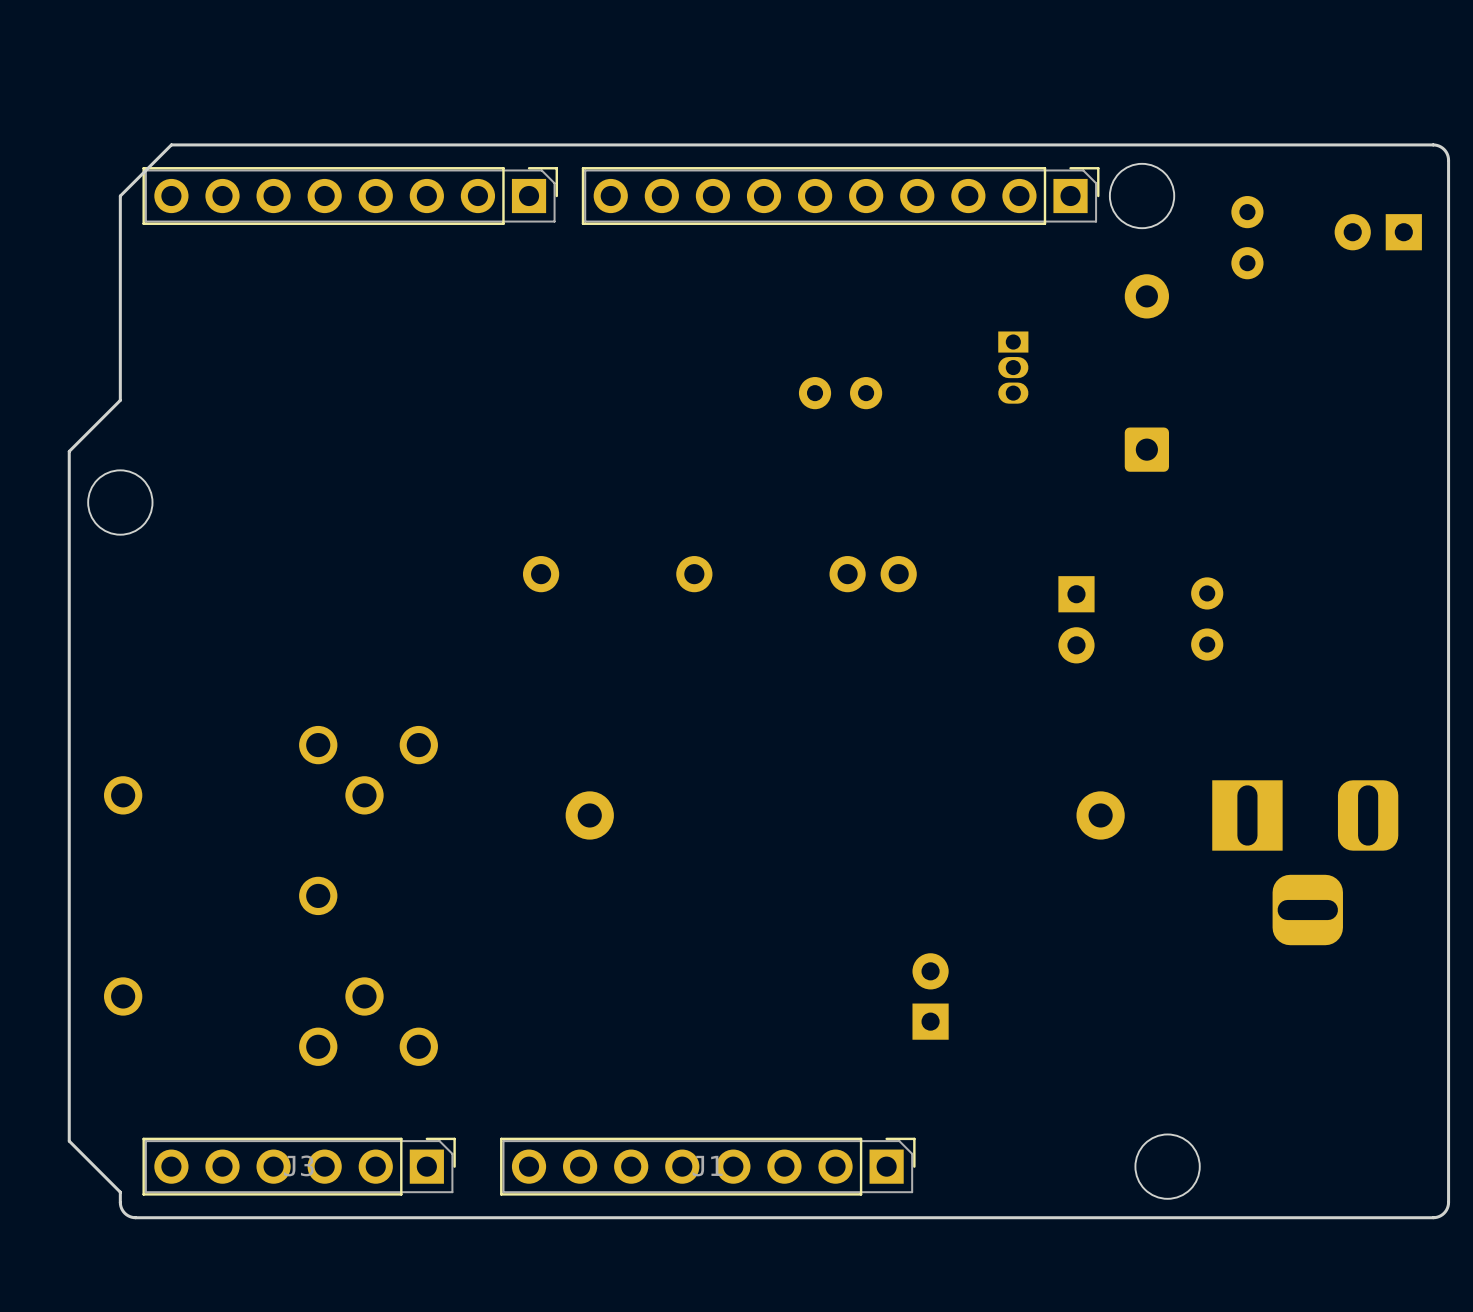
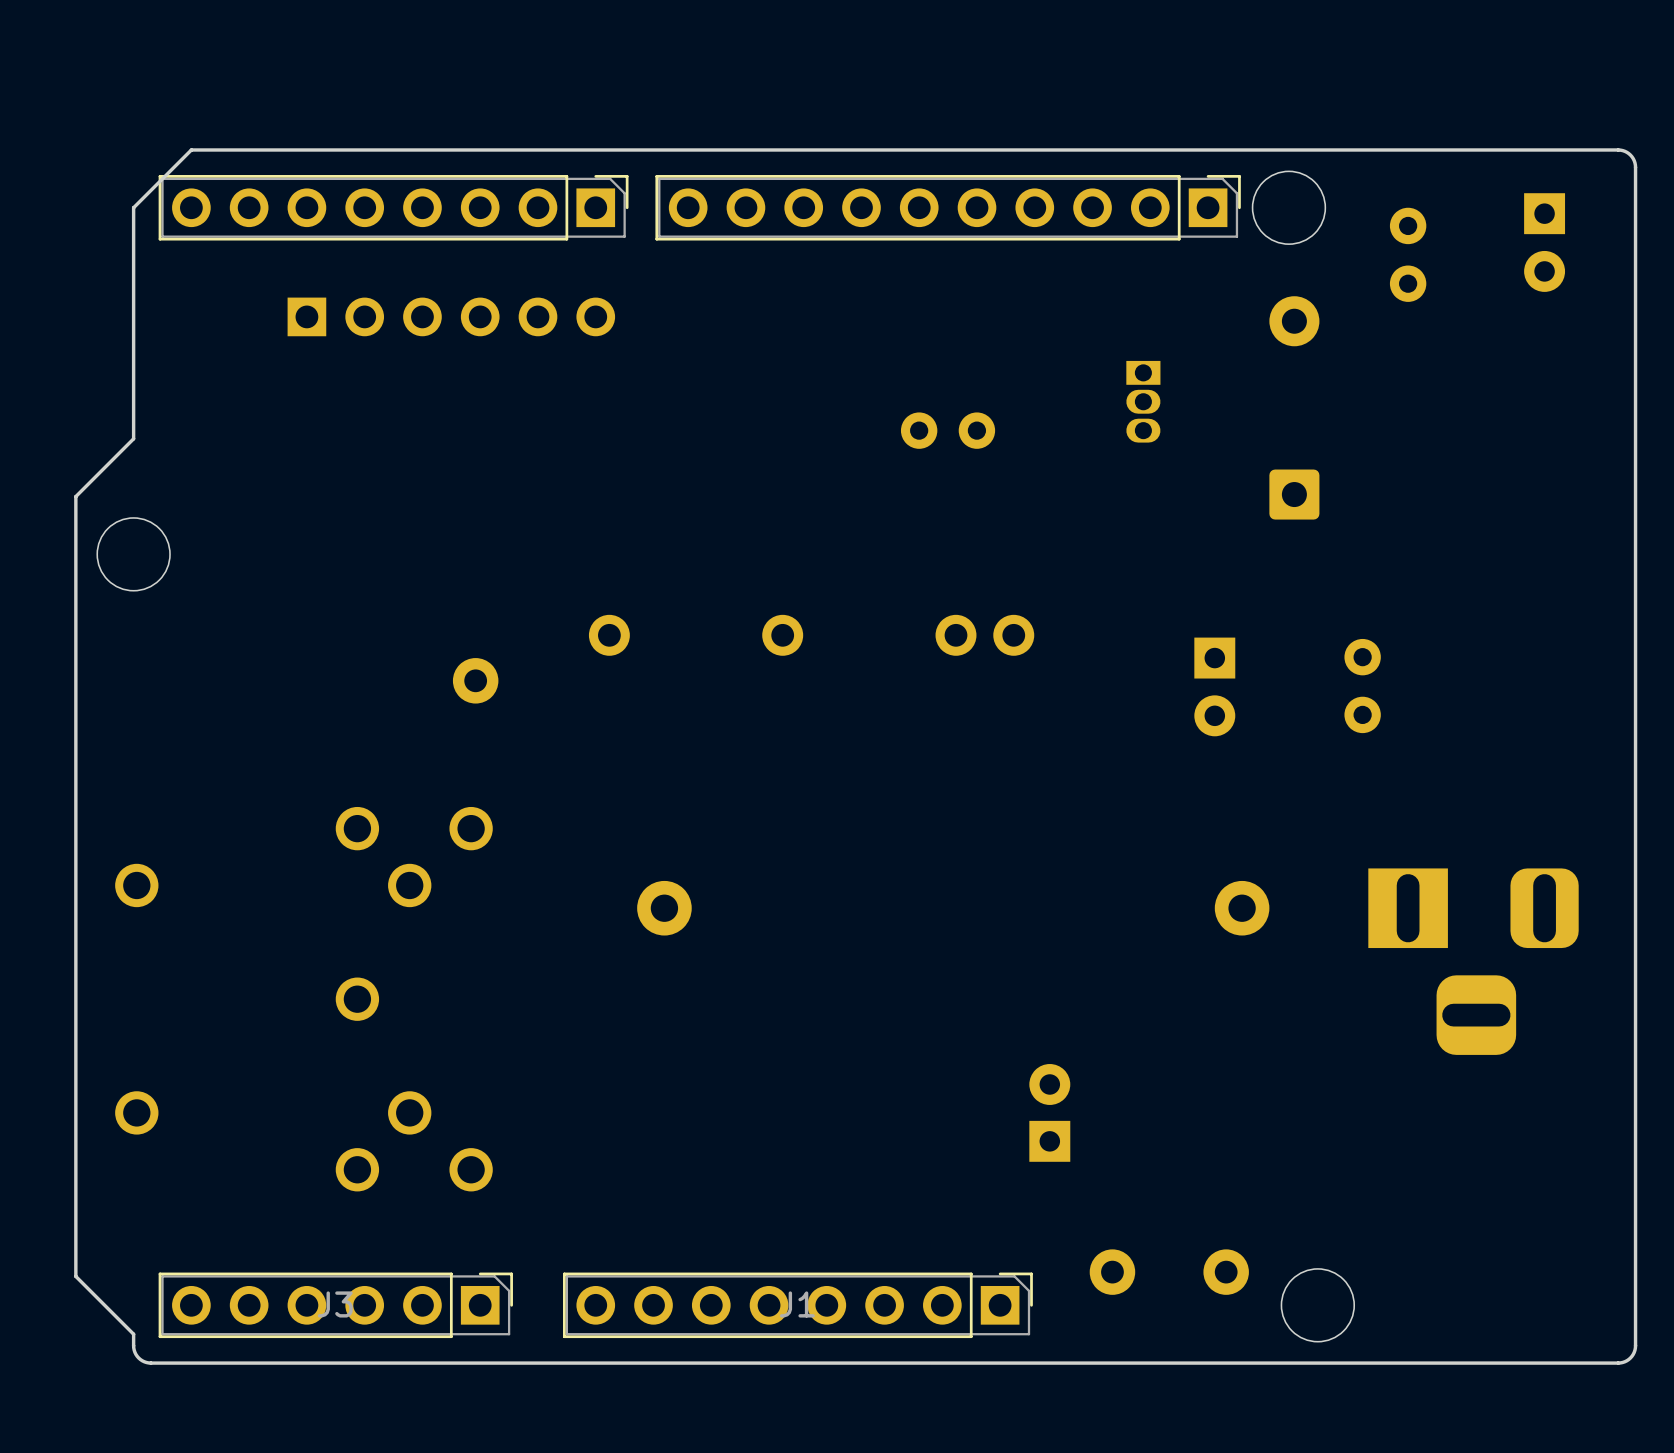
part rotation: 0° (1378, 232) -> 90° counterclockwise (1544, 242)
part: none -> (451, 316)
part: none -> (475, 680)
part: none -> (1112, 1272)
part: none -> (1226, 1272)

